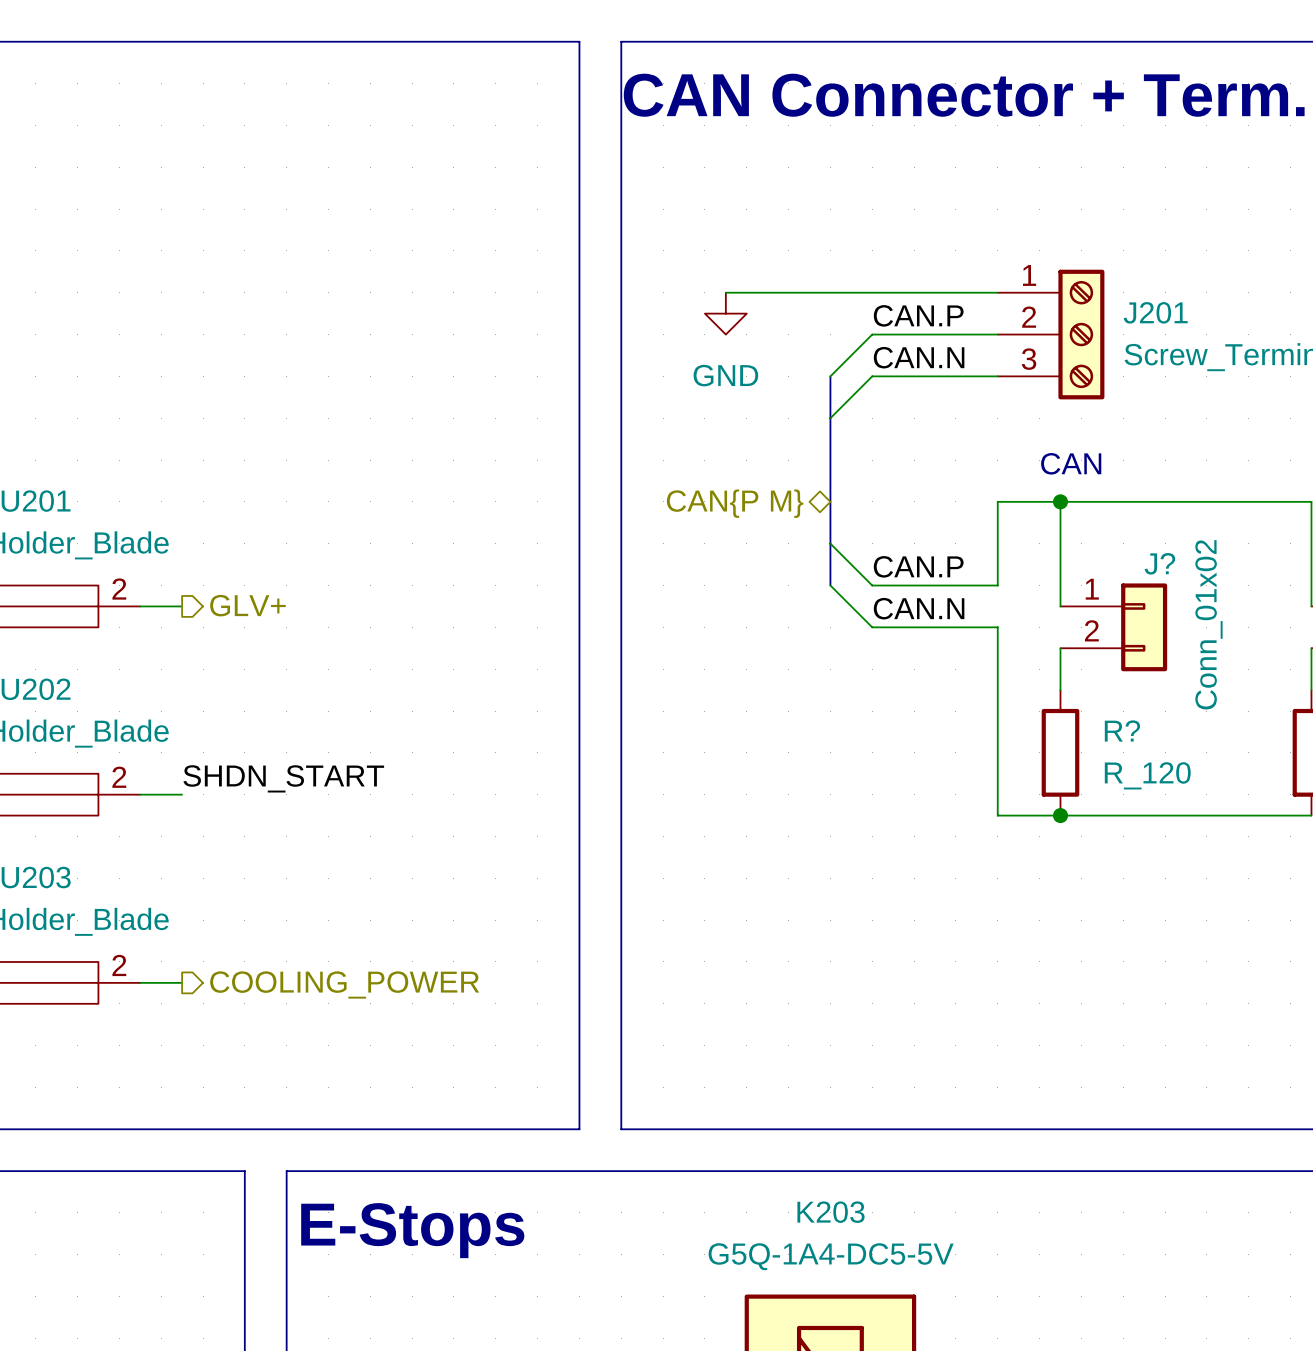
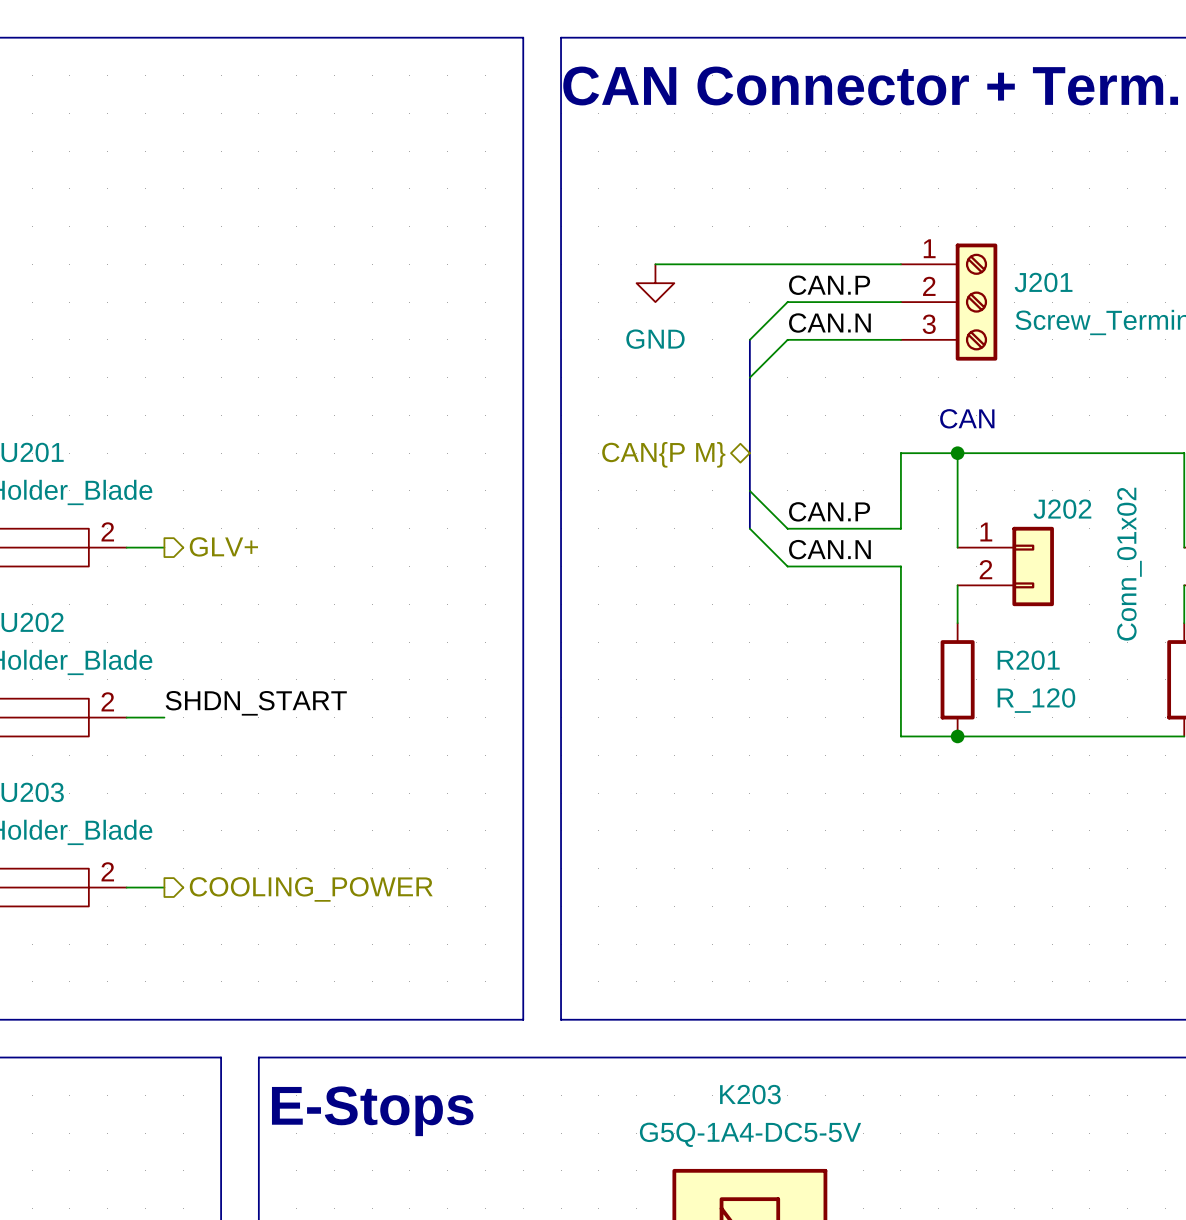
J? name: J? (1159, 563) -> J202 (1062, 509)
J? value position: Conn_01x02 (1208, 624) -> Conn_01x02 (1129, 564)
R? name: R? (1122, 730) -> R201 (1028, 660)

